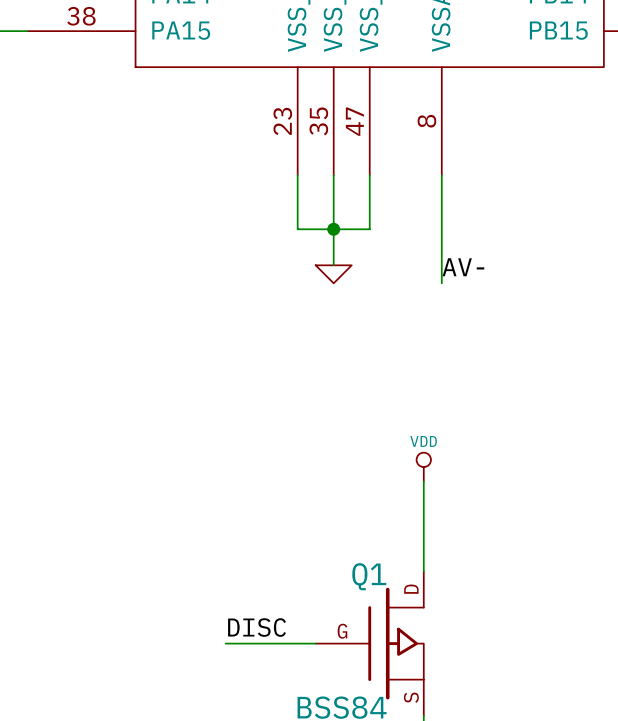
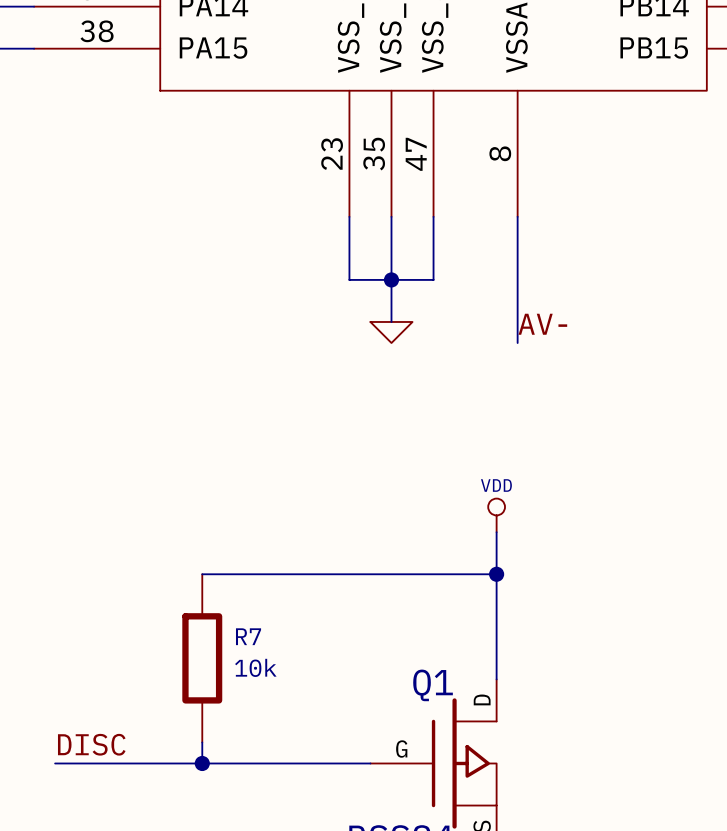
wire: none -> (496, 532) (496, 574) (202, 574)
power symbol position: VDD (423, 467) -> VDD (496, 515)
junction: none -> (496, 574)
R7: none -> 10k (202, 658)
wire: none -> (202, 742) (202, 763)
label position: DISC (257, 627) -> DISC (91, 744)
wire: none -> (55, 763) (265, 763)
junction: none -> (202, 763)

